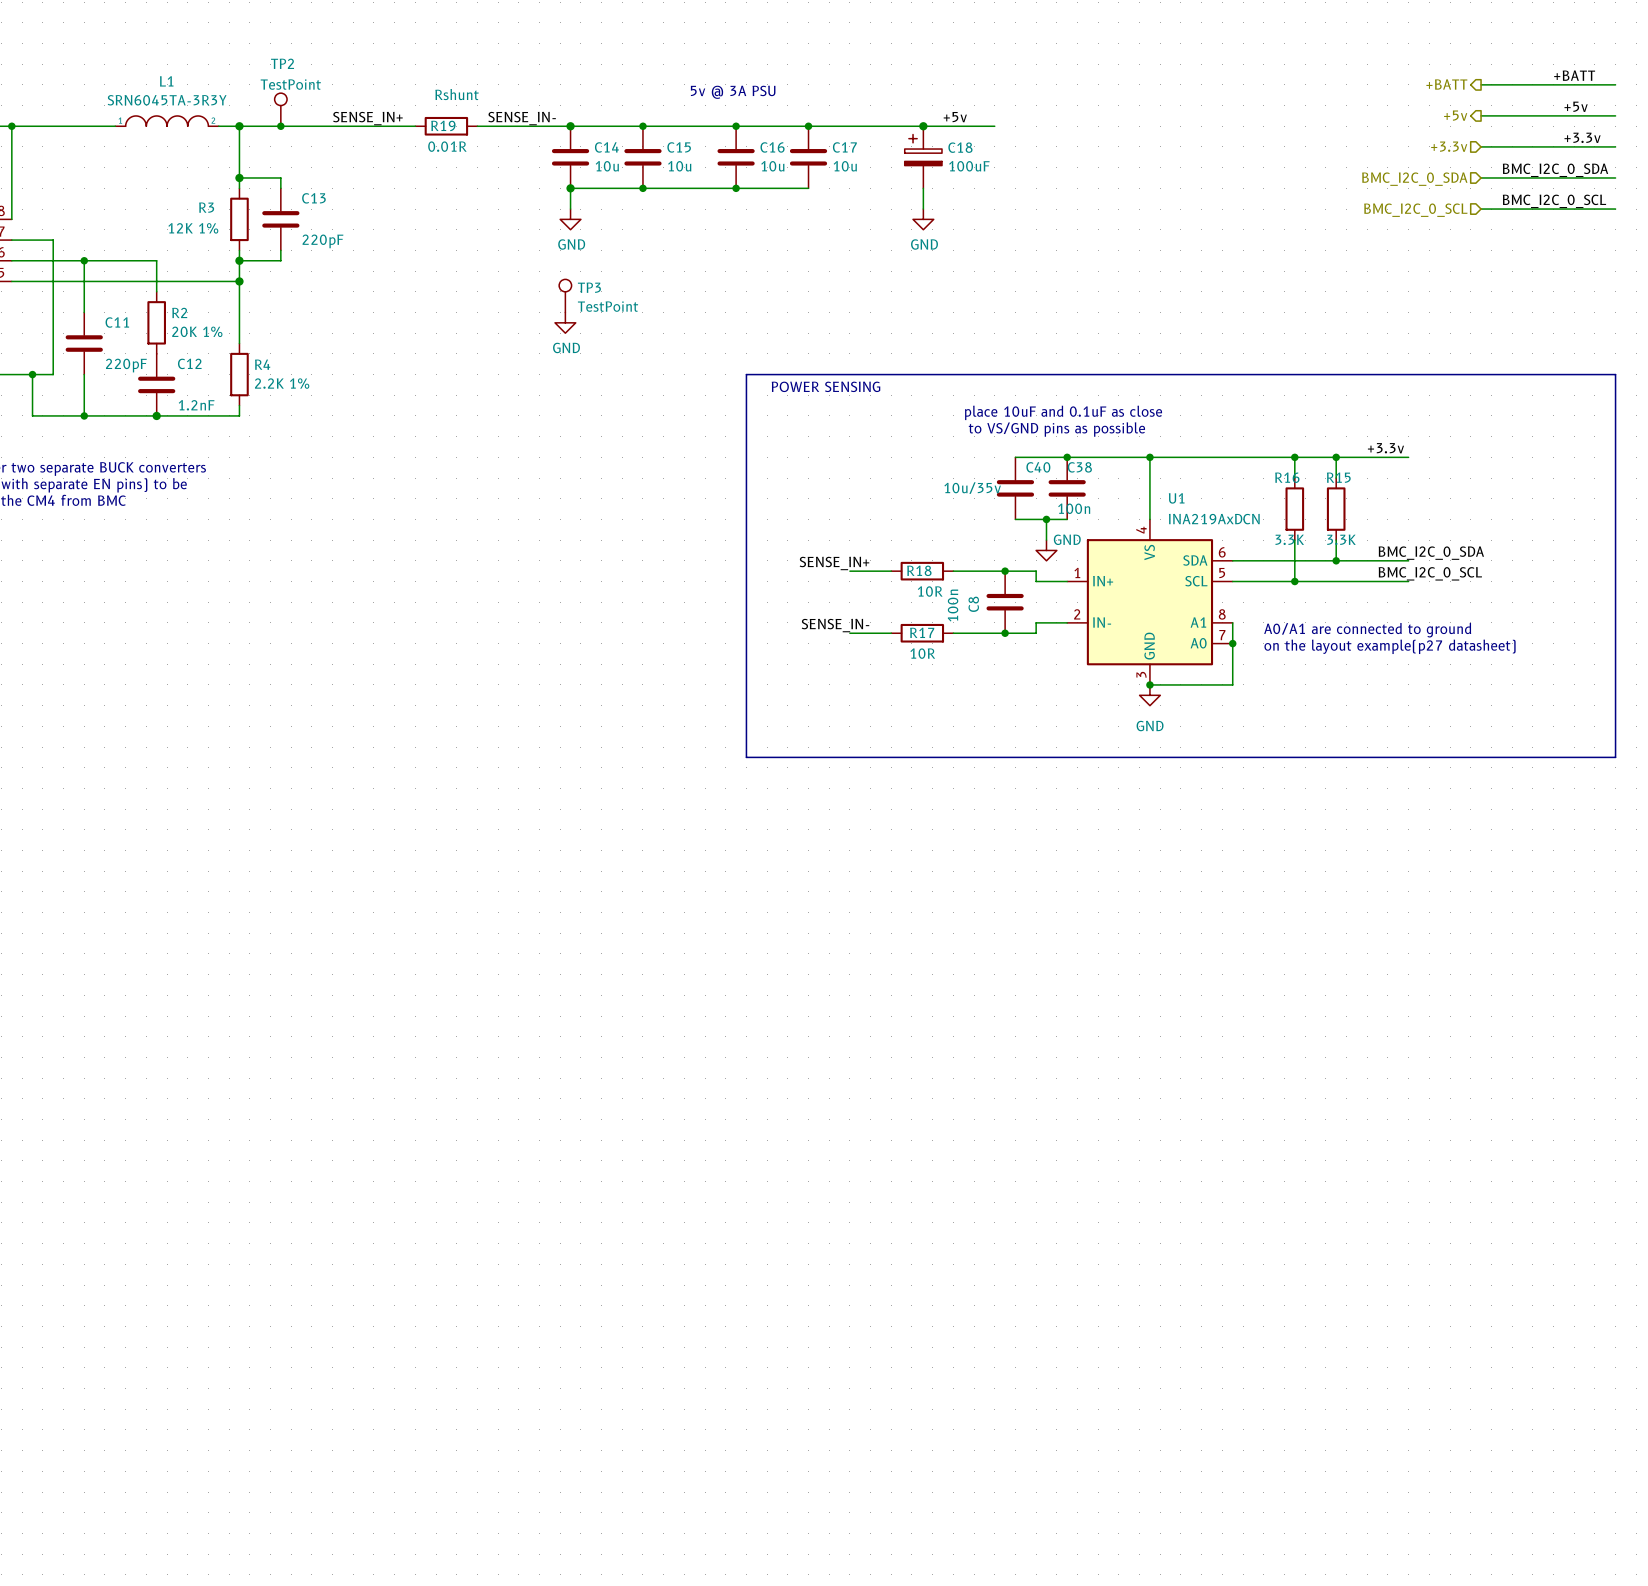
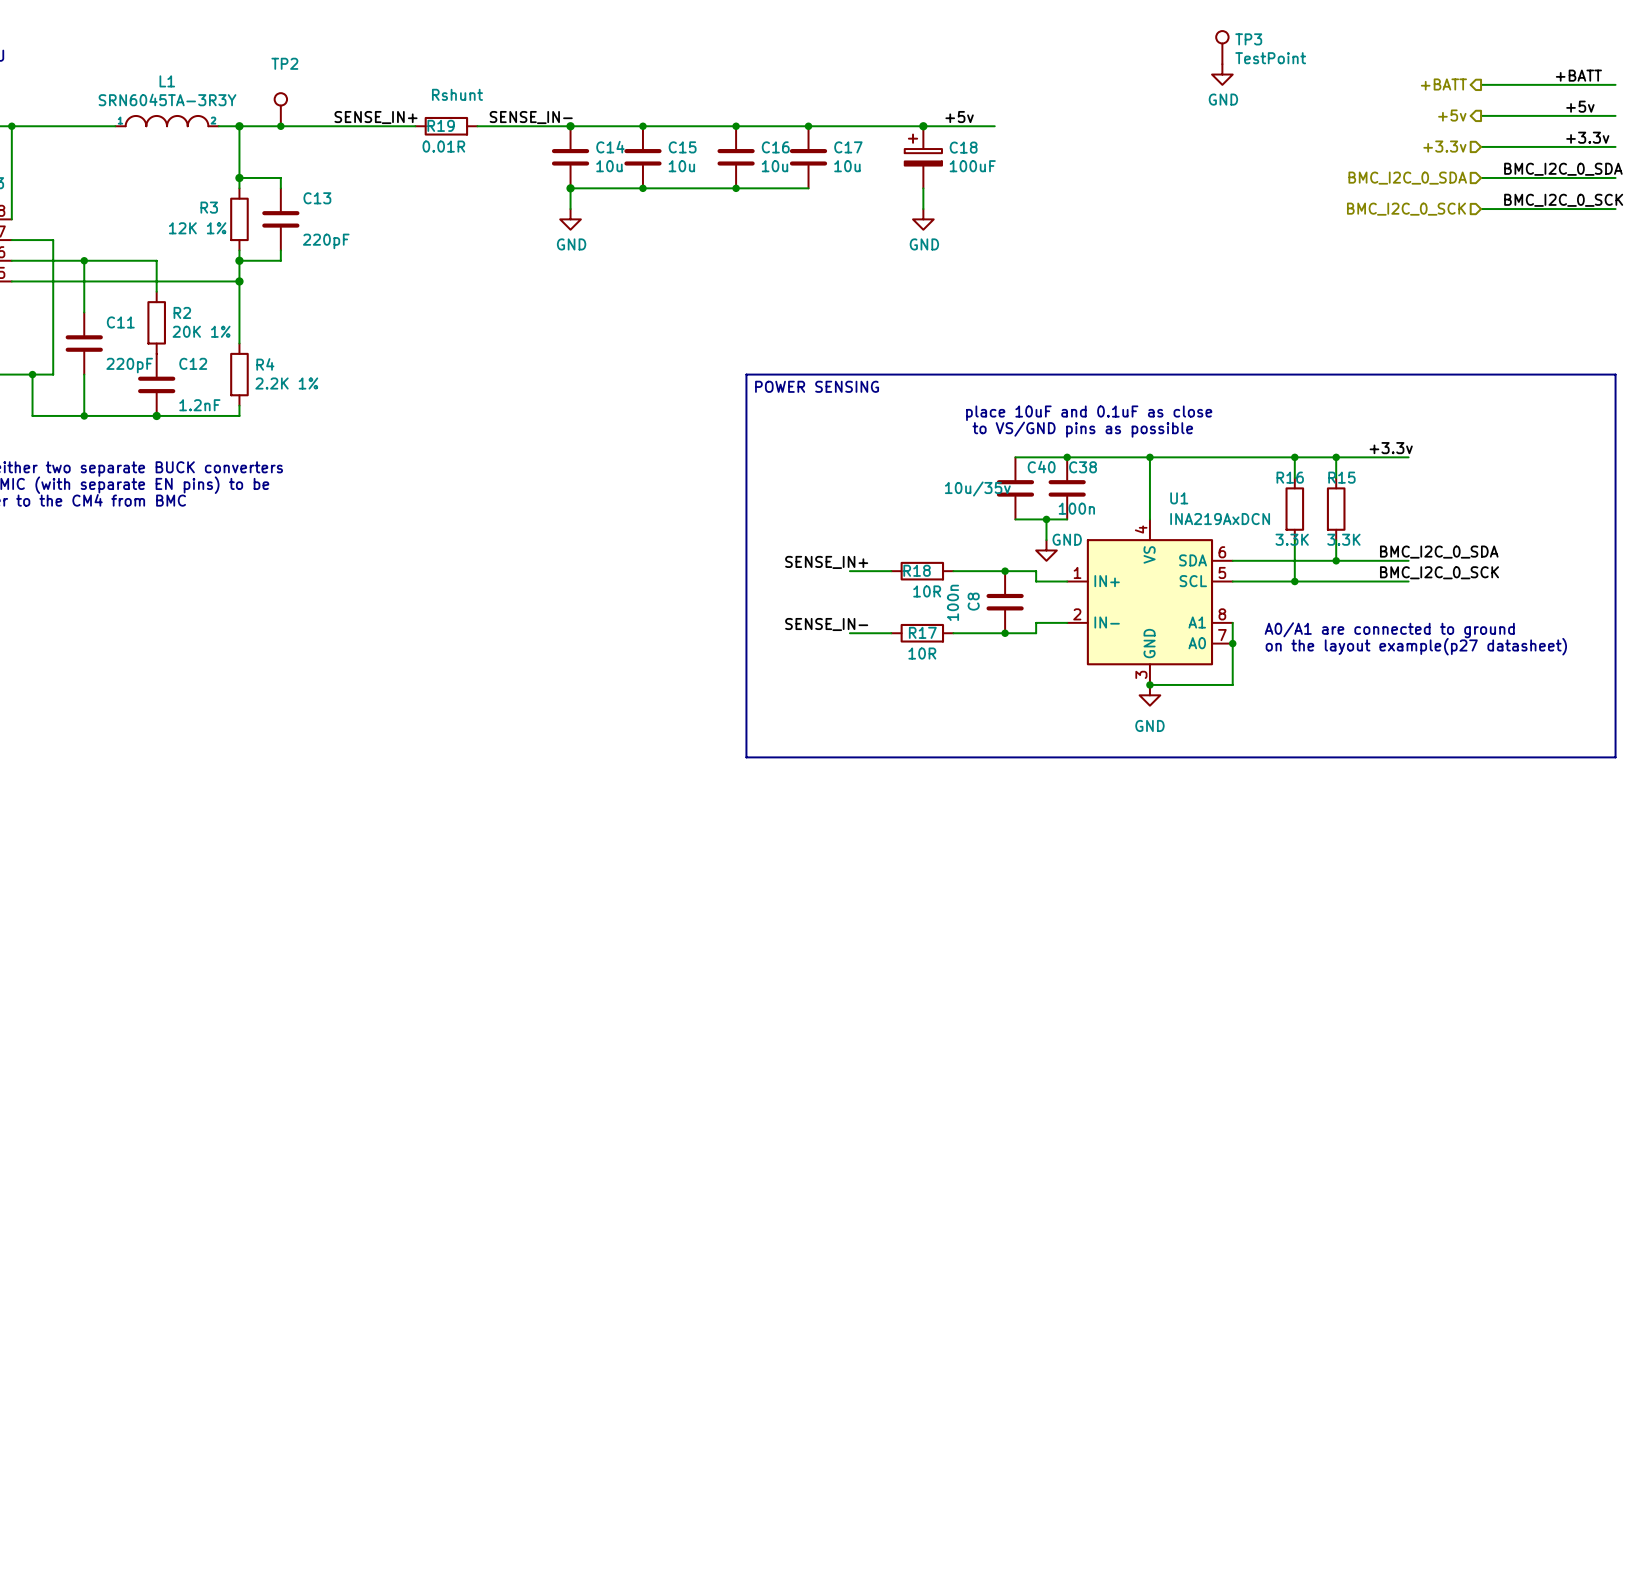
power symbol: none -> GND (1222, 74)
TP2 value: TestPoint (290, 84) -> none
text: 5v @ 3A PSU (733, 92) -> none
label: BMC_I2C_0_SCL (1554, 201) -> BMC_I2C_0_SCK (1563, 200)
hierarchical label: BMC_I2C_0_SCL (1415, 210) -> BMC_I2C_0_SCK (1406, 209)
TP3 position: (565, 295) -> (1222, 47)
power symbol: GND (565, 322) -> none
label: BMC_I2C_0_SCL (1430, 573) -> BMC_I2C_0_SCK (1439, 572)

